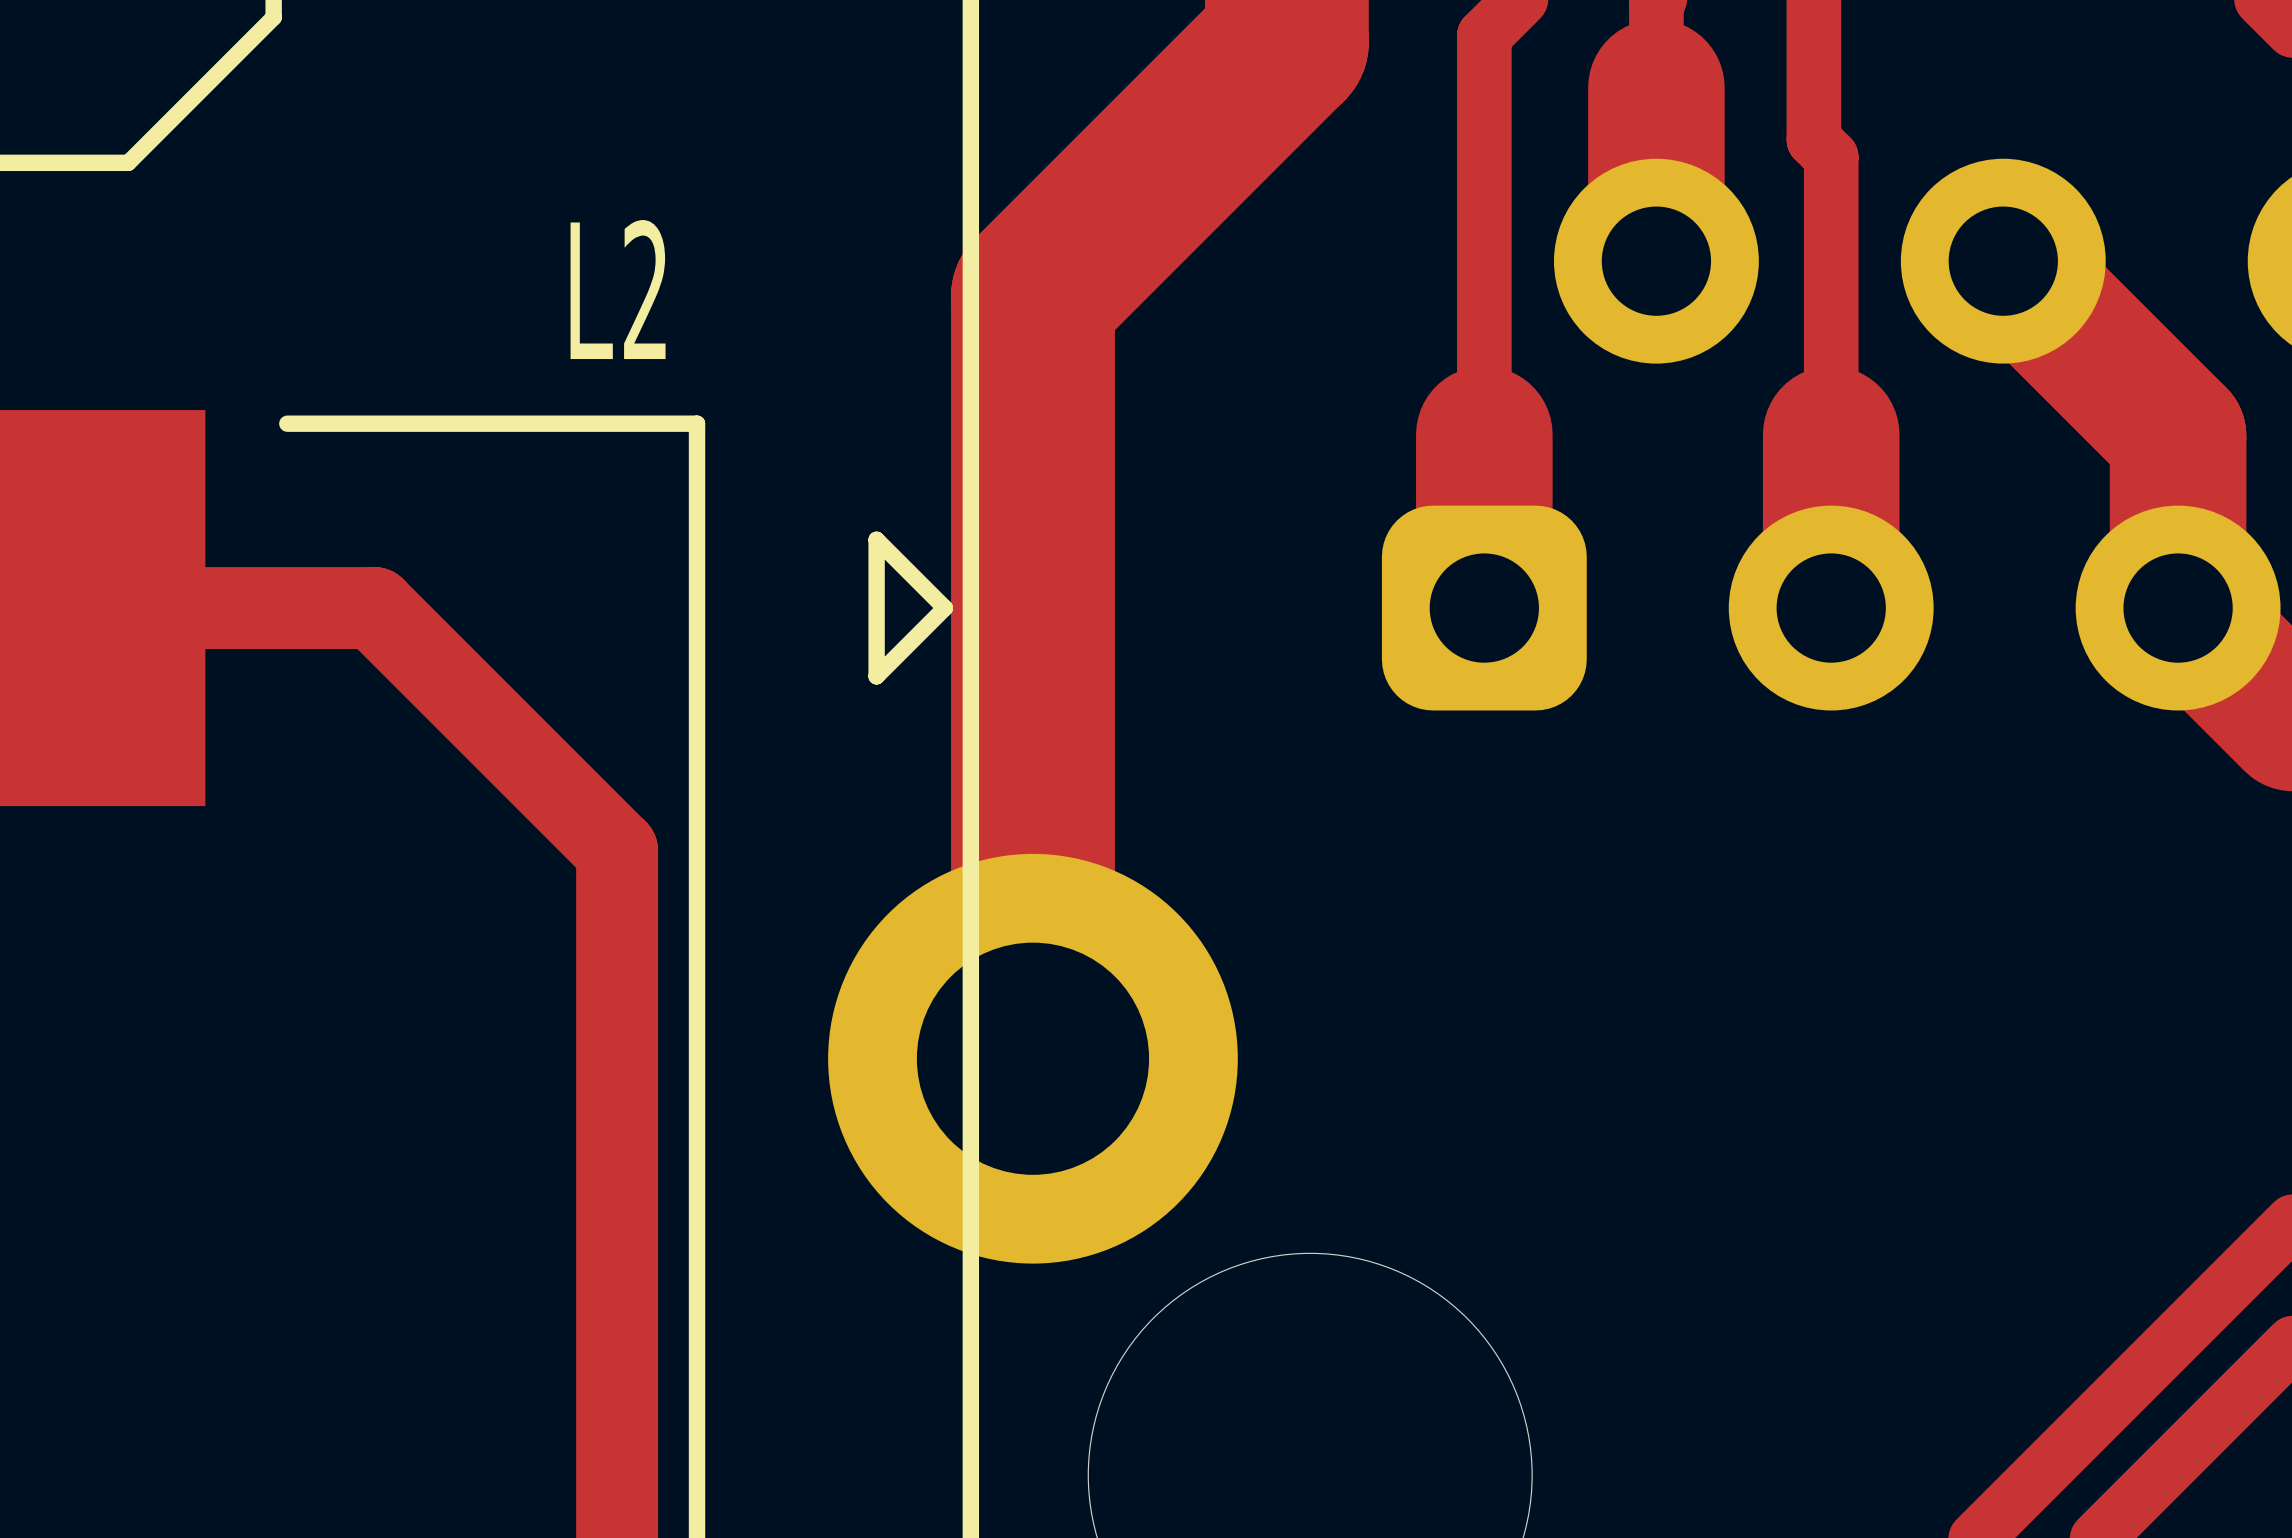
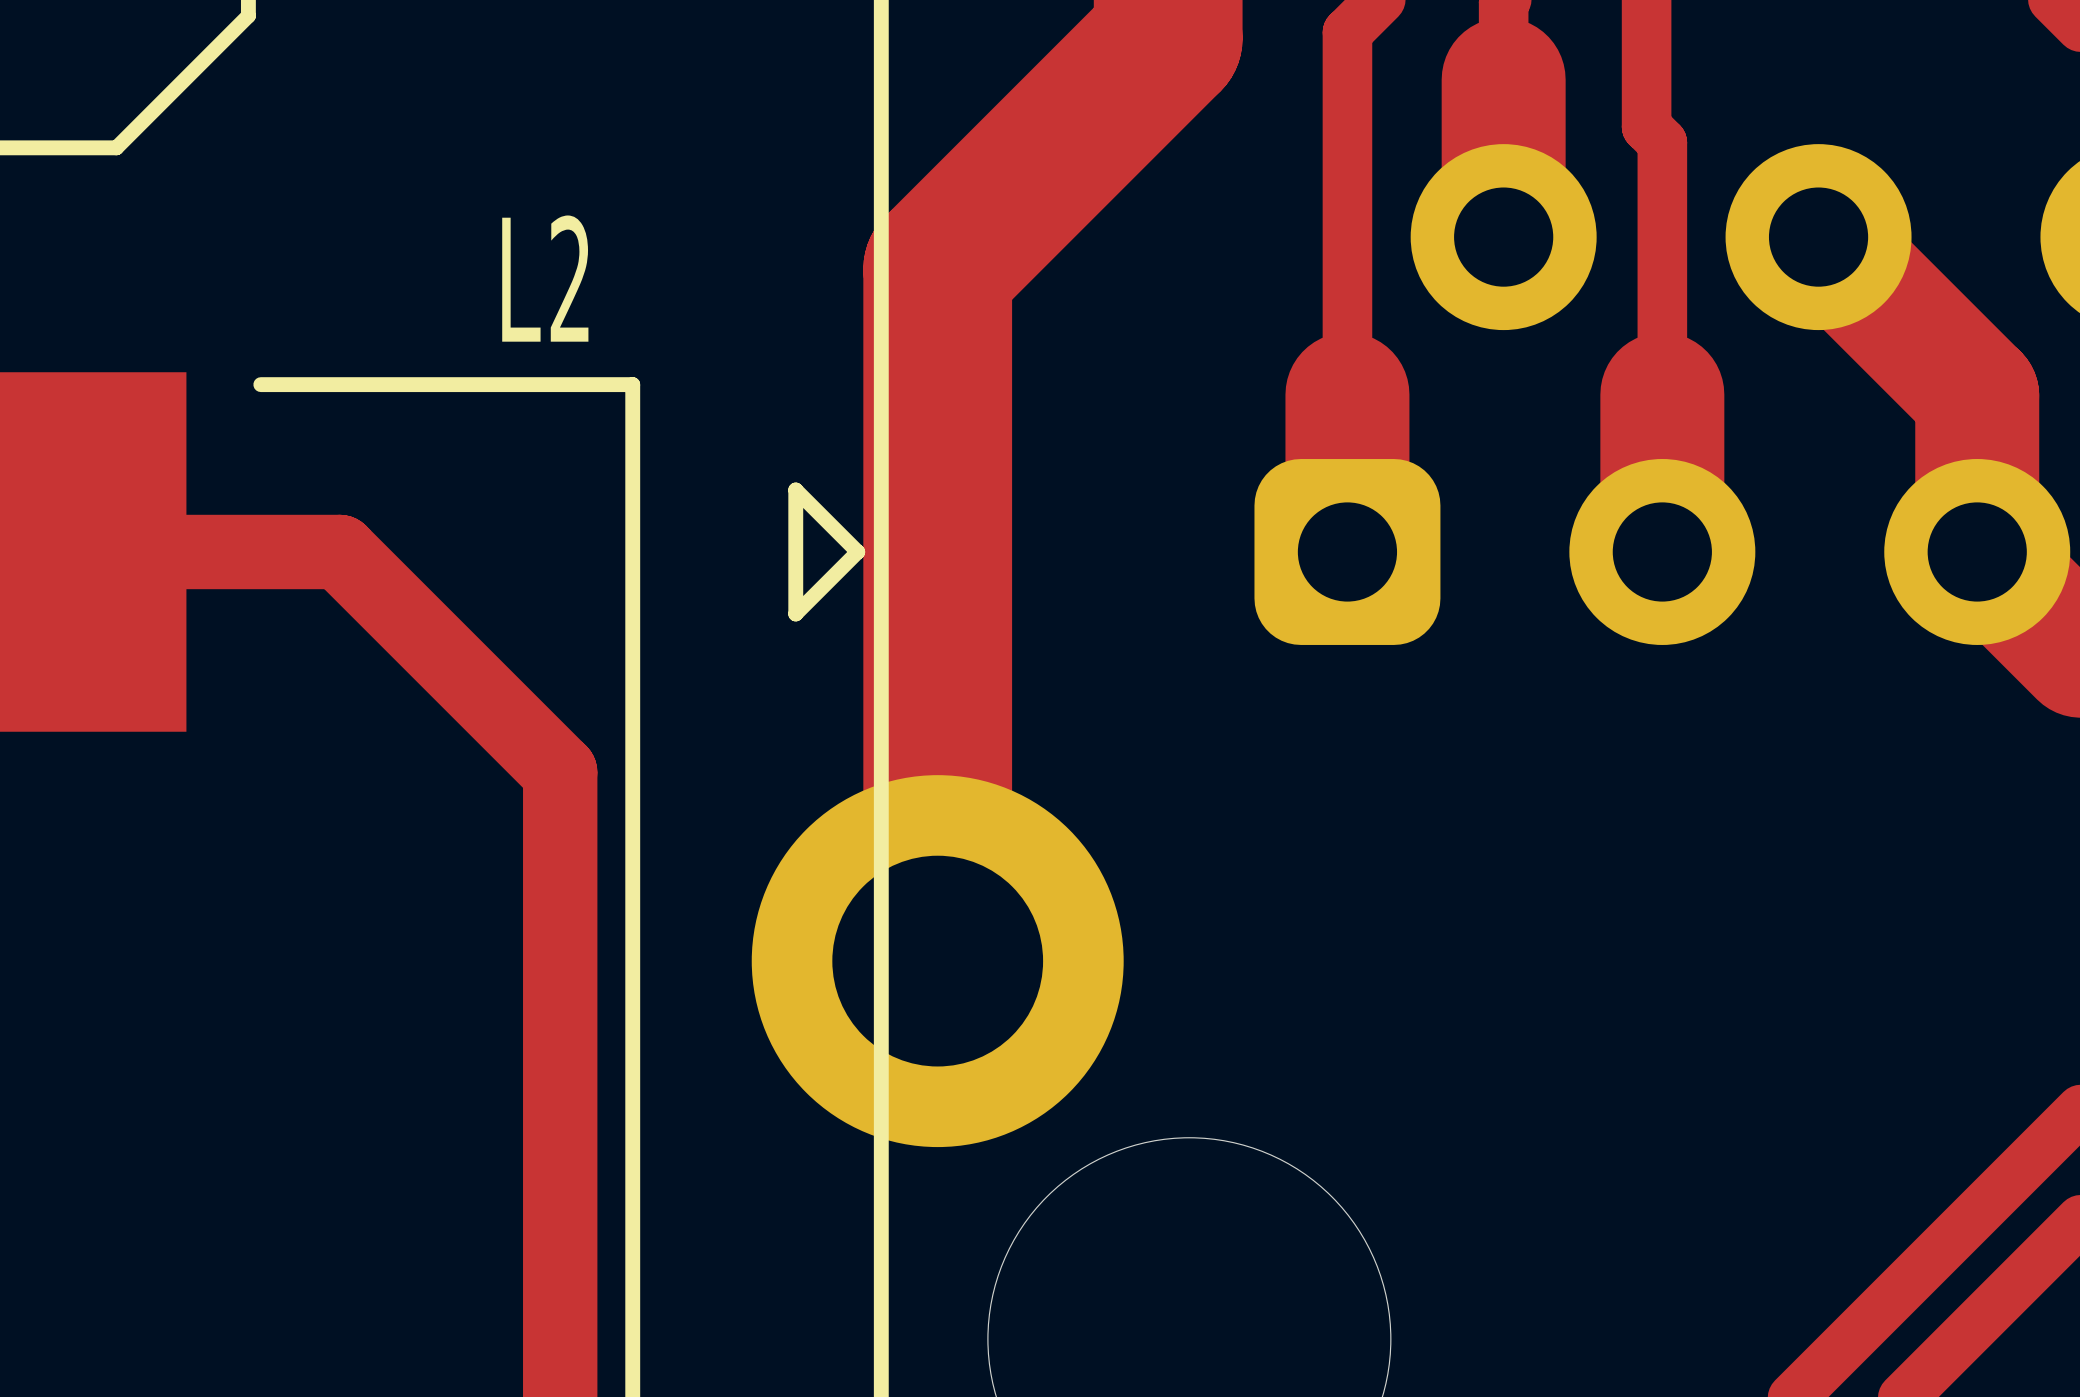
L2 name position: L2 (618, 289) -> L2 (545, 278)

